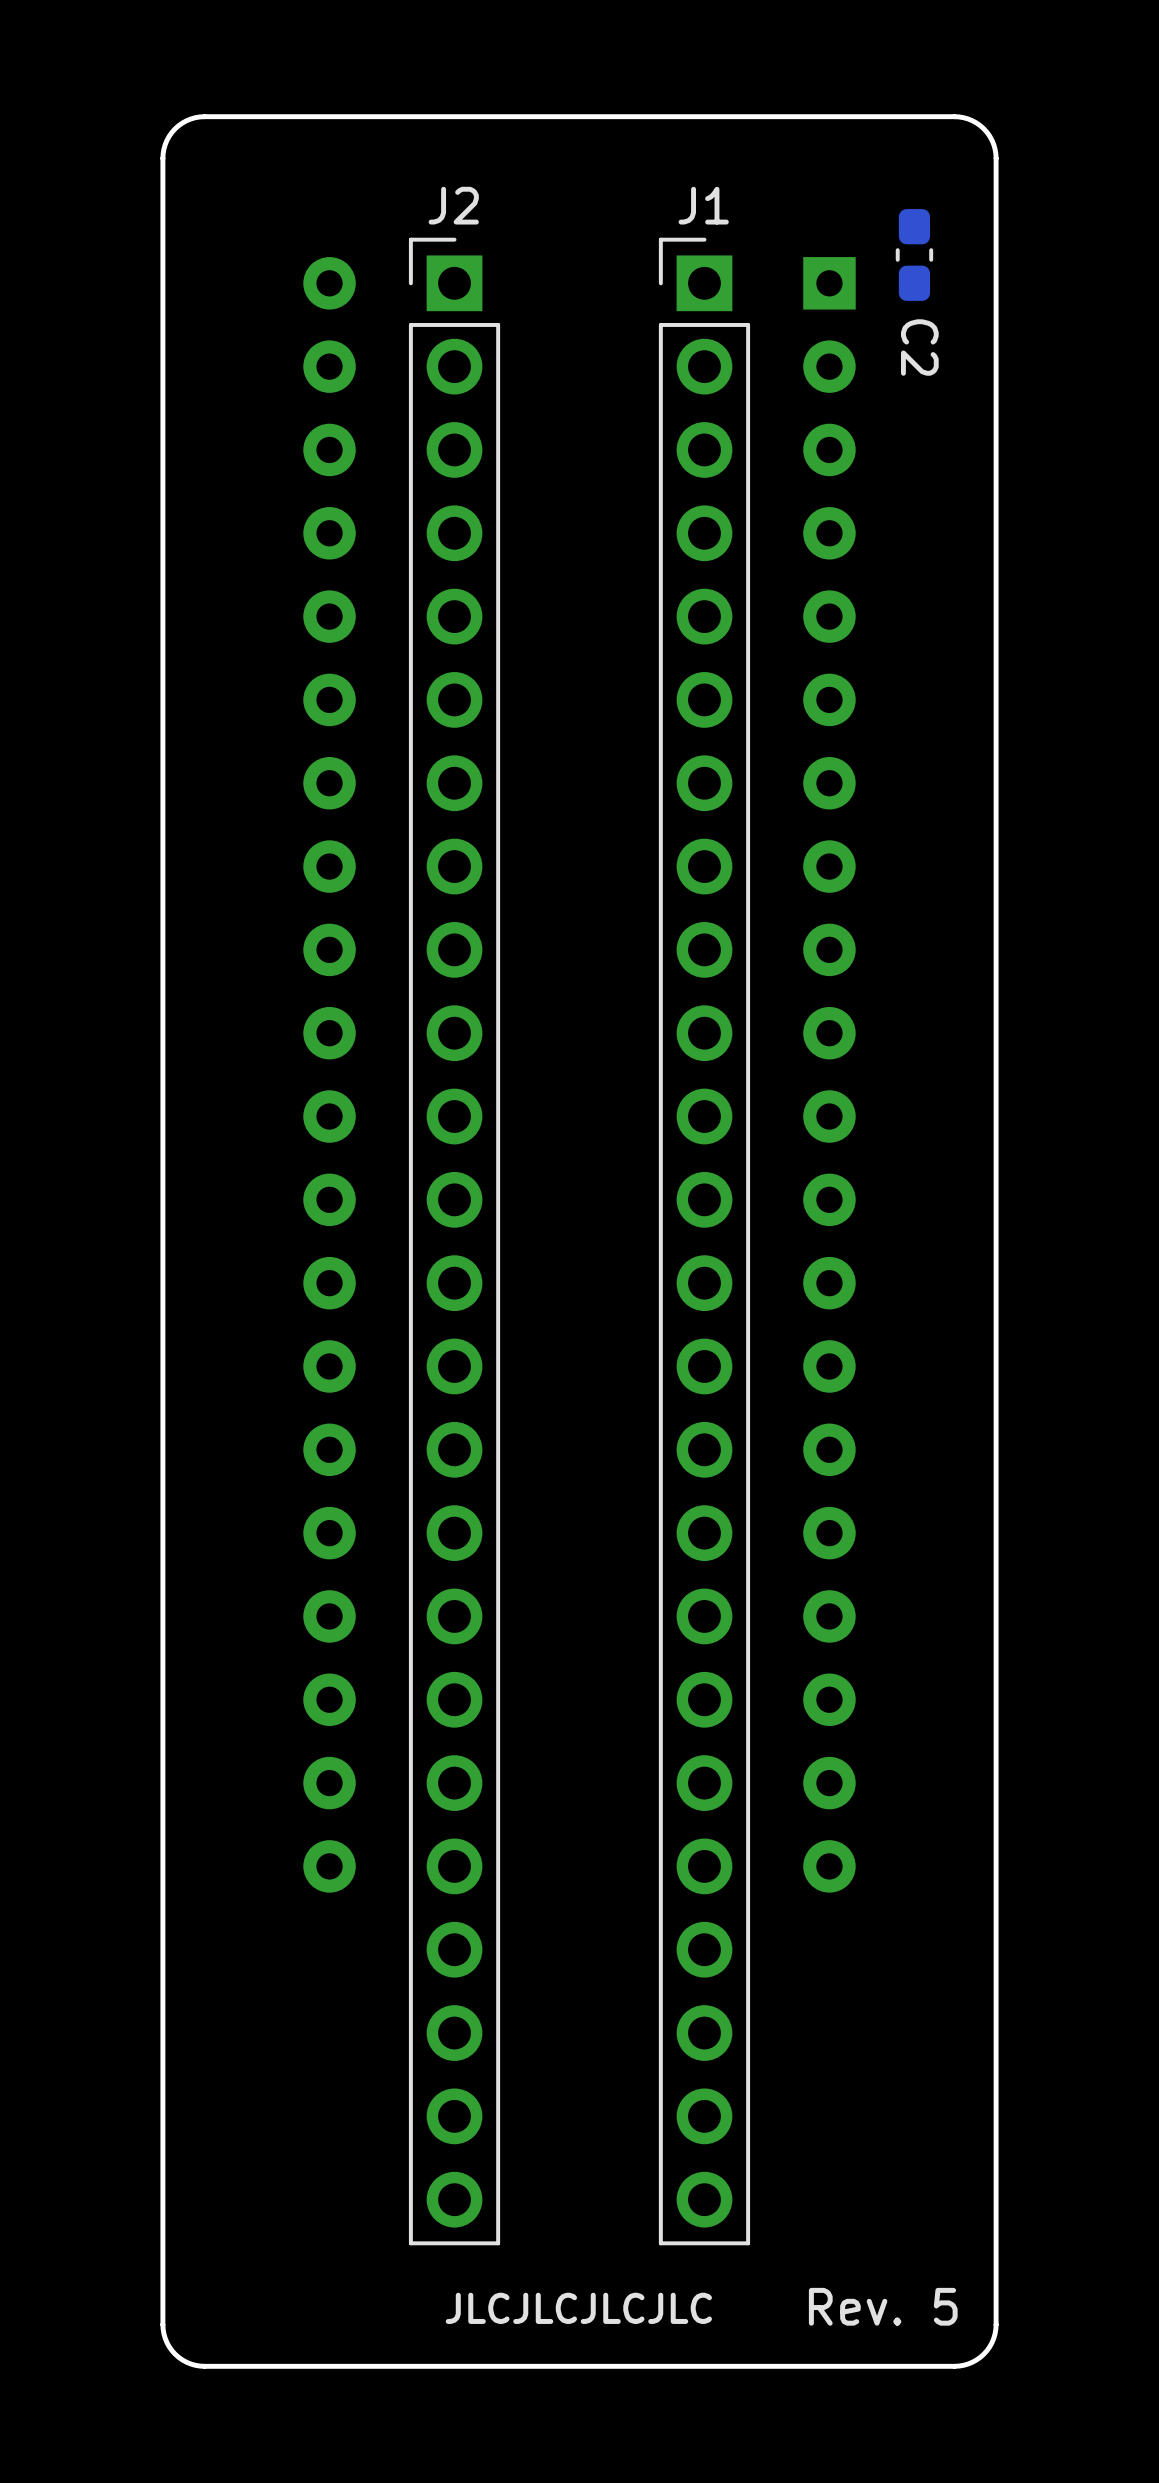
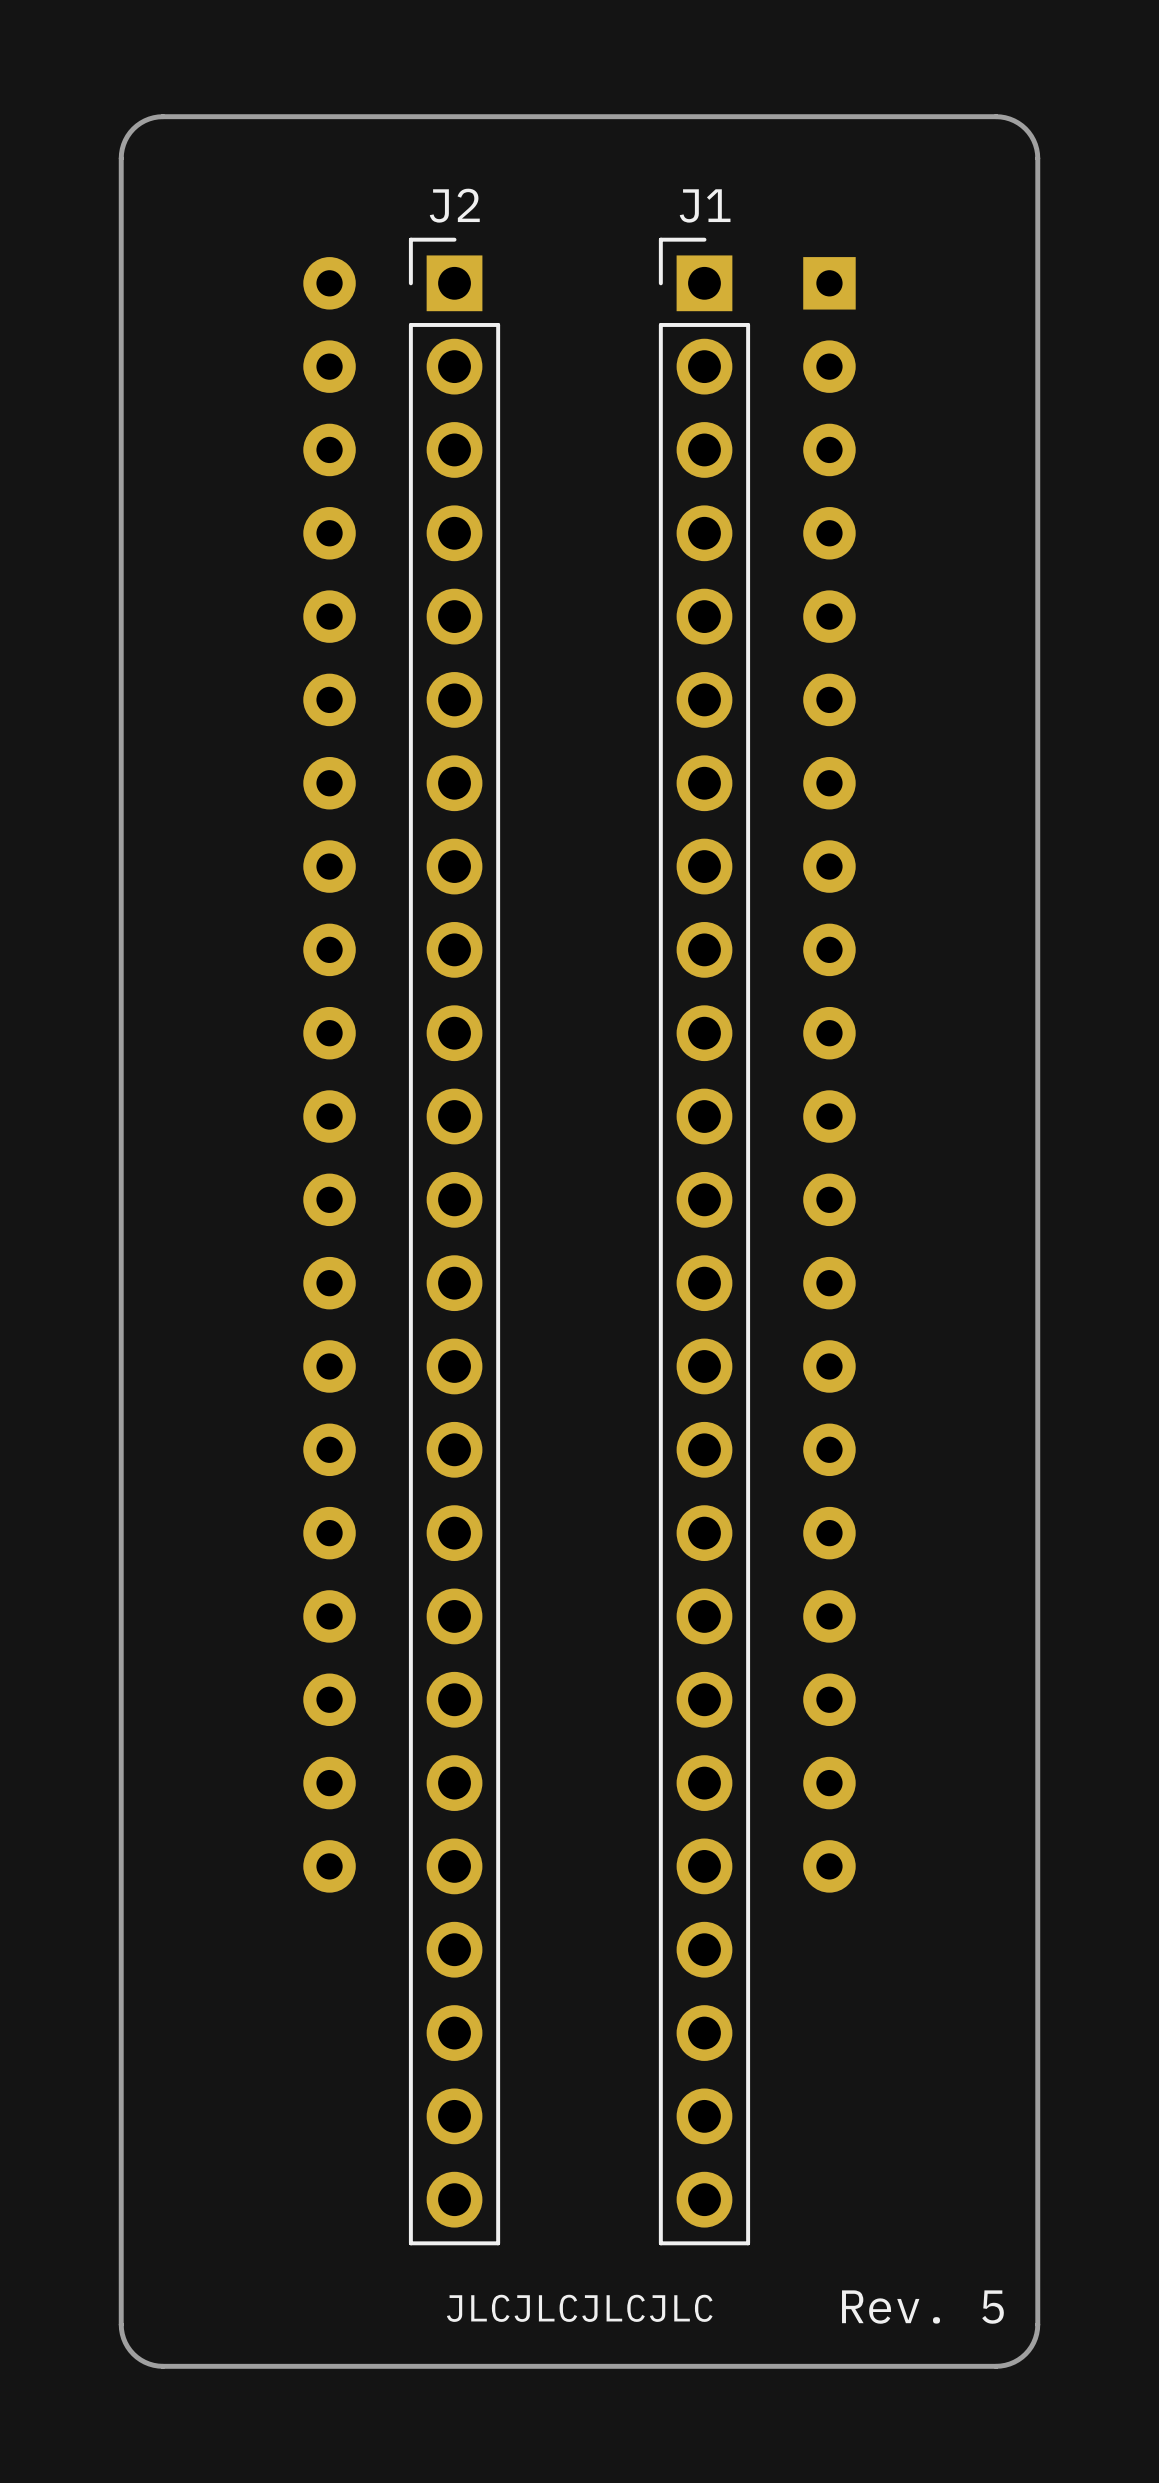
board edge: (204, 116) (190, 119) (175, 128) (165, 144) (162, 158) (162, 2324) (165, 2338) (175, 2354) (190, 2363) (204, 2366) -> (204, 116) (158, 116) (144, 120) (136, 125) (127, 136) (122, 149) (121, 158) (121, 2324) (122, 2333) (127, 2346) (136, 2357) (144, 2362) (158, 2366) (204, 2366)
board edge: (954, 116) (968, 119) (983, 128) (993, 144) (996, 158) (996, 2324) (993, 2338) (983, 2354) (968, 2363) (954, 2366) -> (954, 116) (1000, 116) (1014, 120) (1022, 125) (1031, 136) (1036, 149) (1037, 158) (1037, 2324) (1036, 2333) (1031, 2346) (1025, 2354) (1014, 2362) (1000, 2366) (954, 2366)
C2: (914, 254) -> none
text position: Rev. 5 (883, 2306) -> Rev. 5 (922, 2307)

